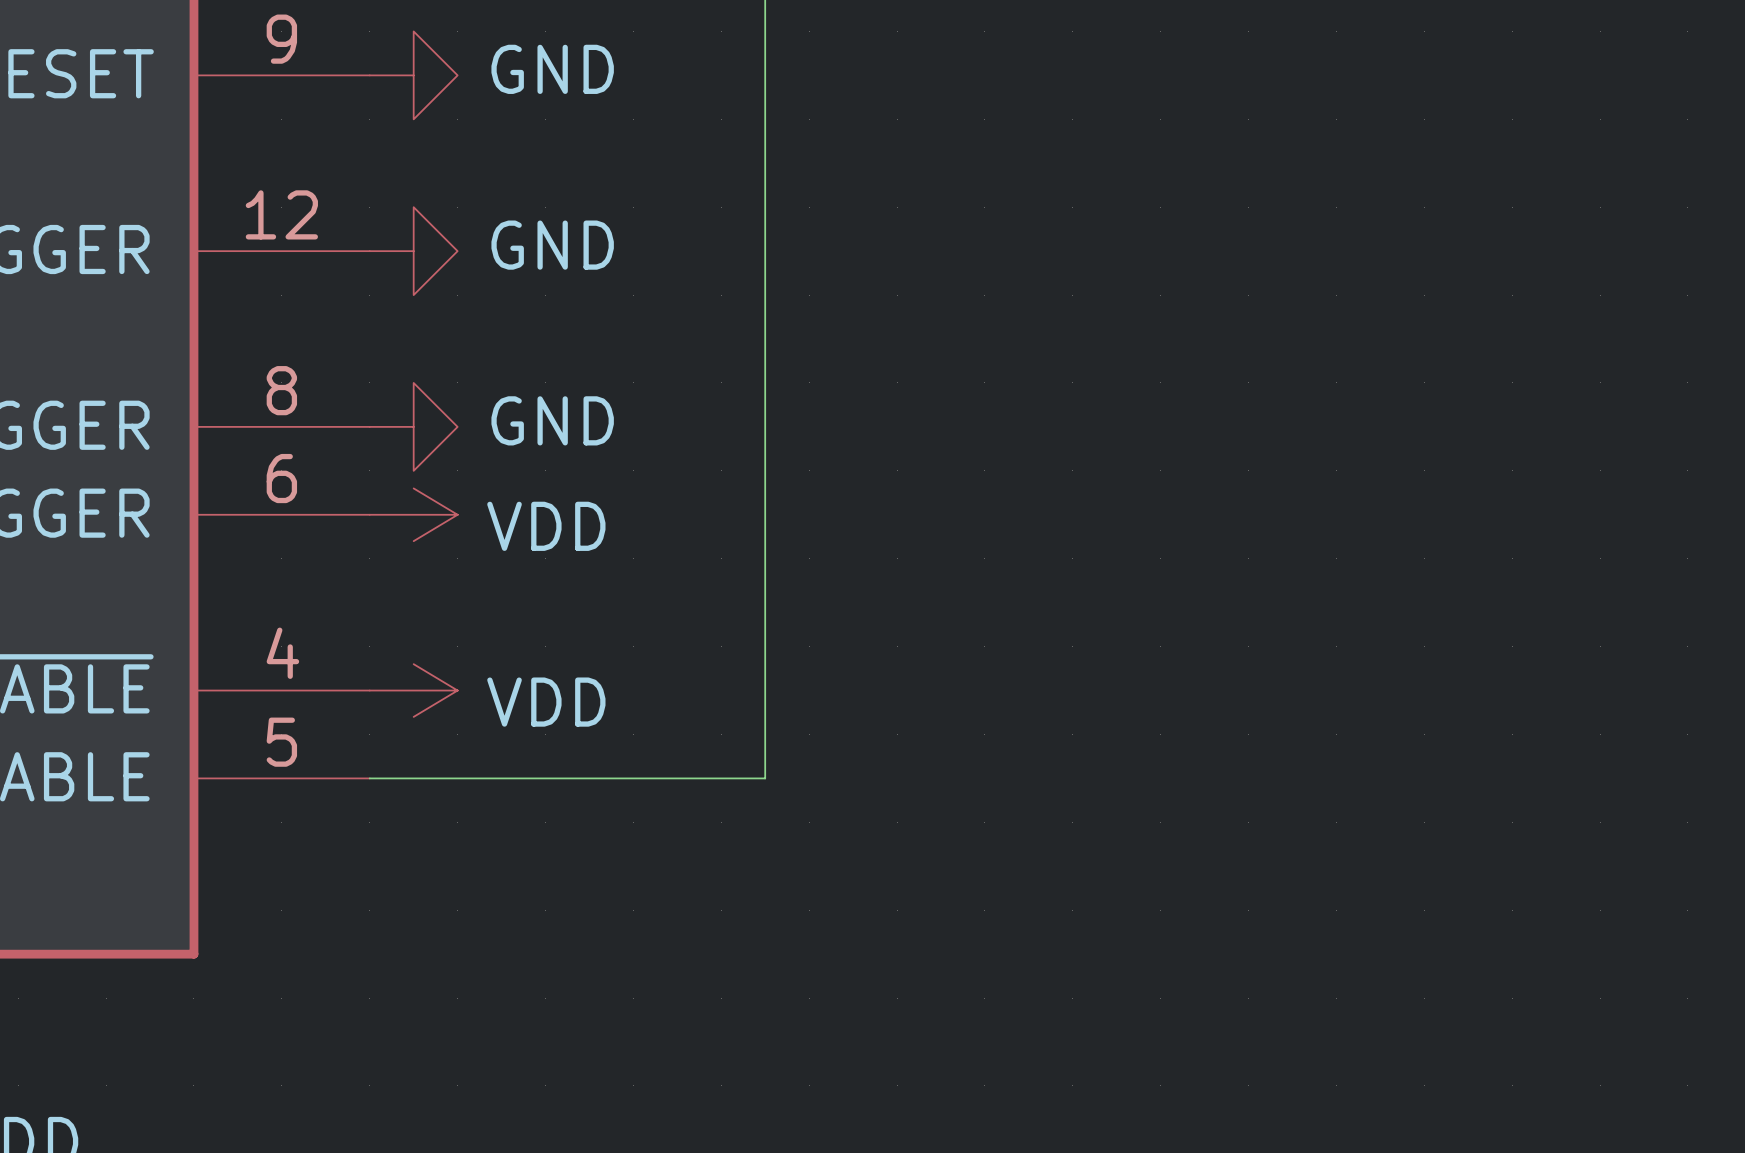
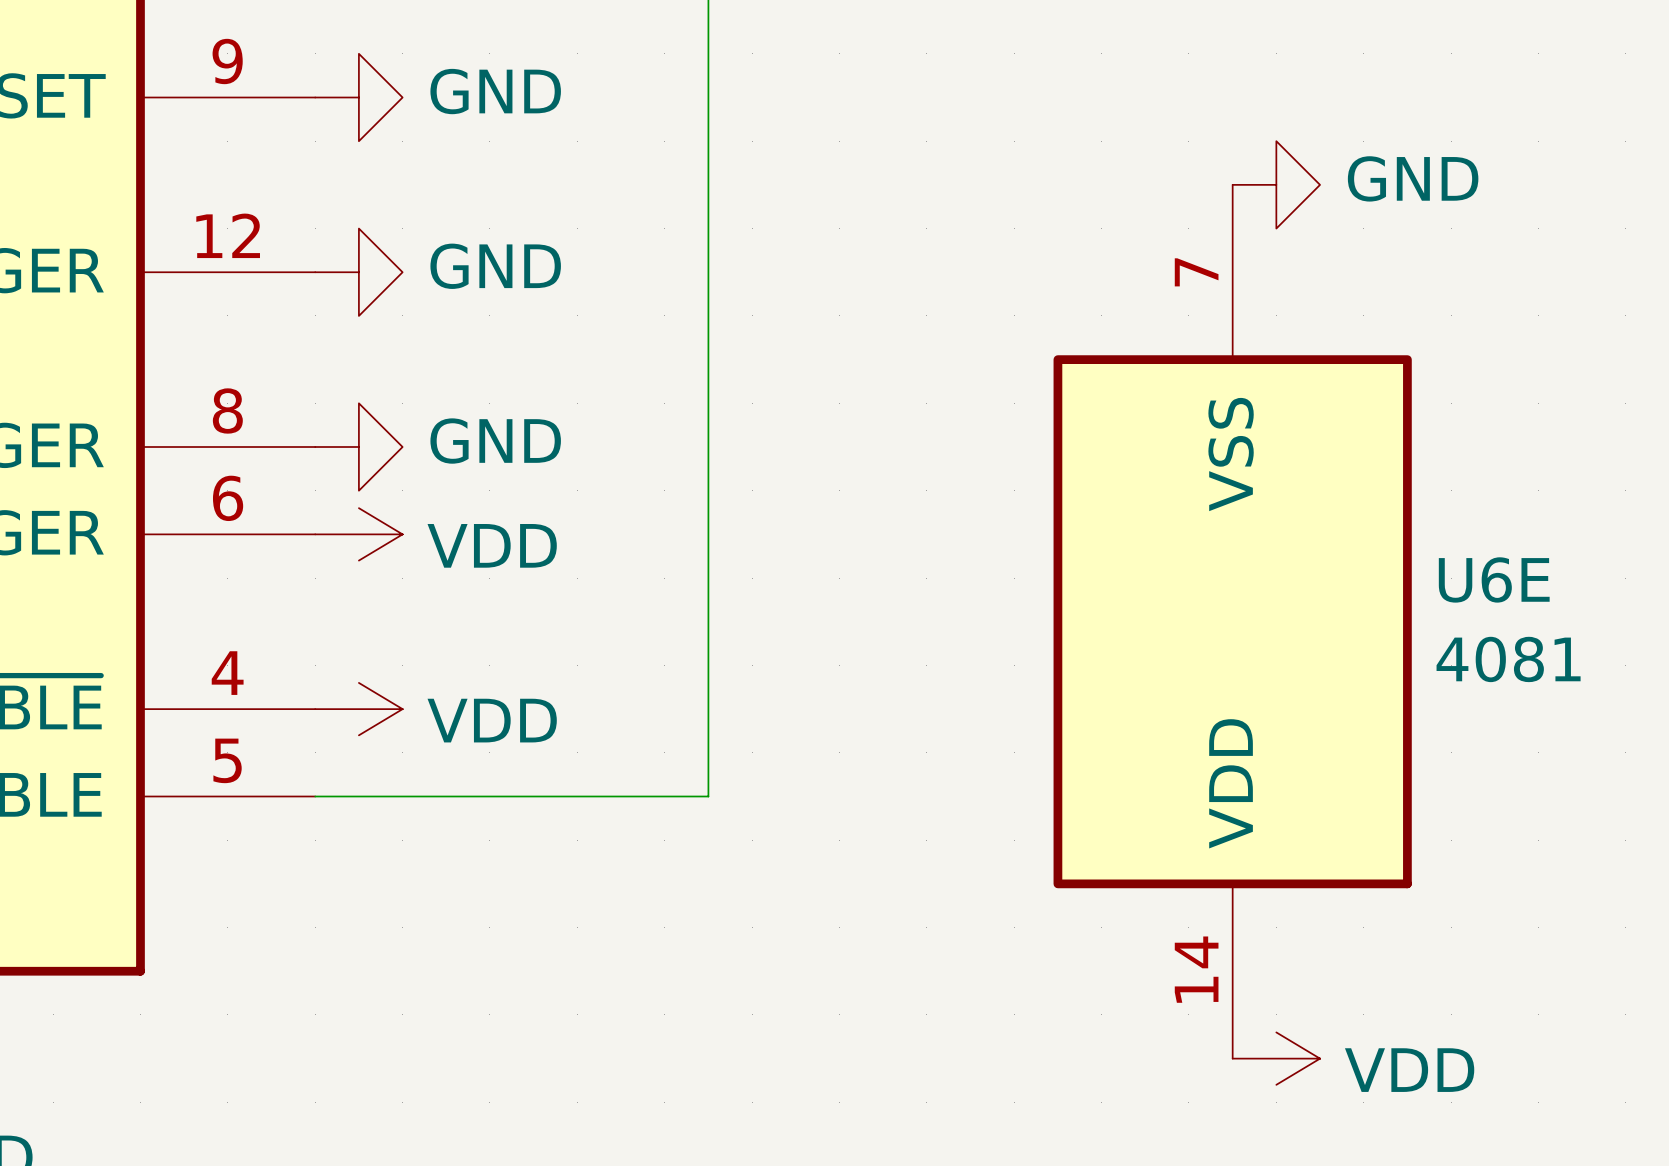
power symbol: none -> GND (1276, 184)
U6E: none -> 4081 (1232, 621)
power symbol: none -> VDD (1276, 1058)

